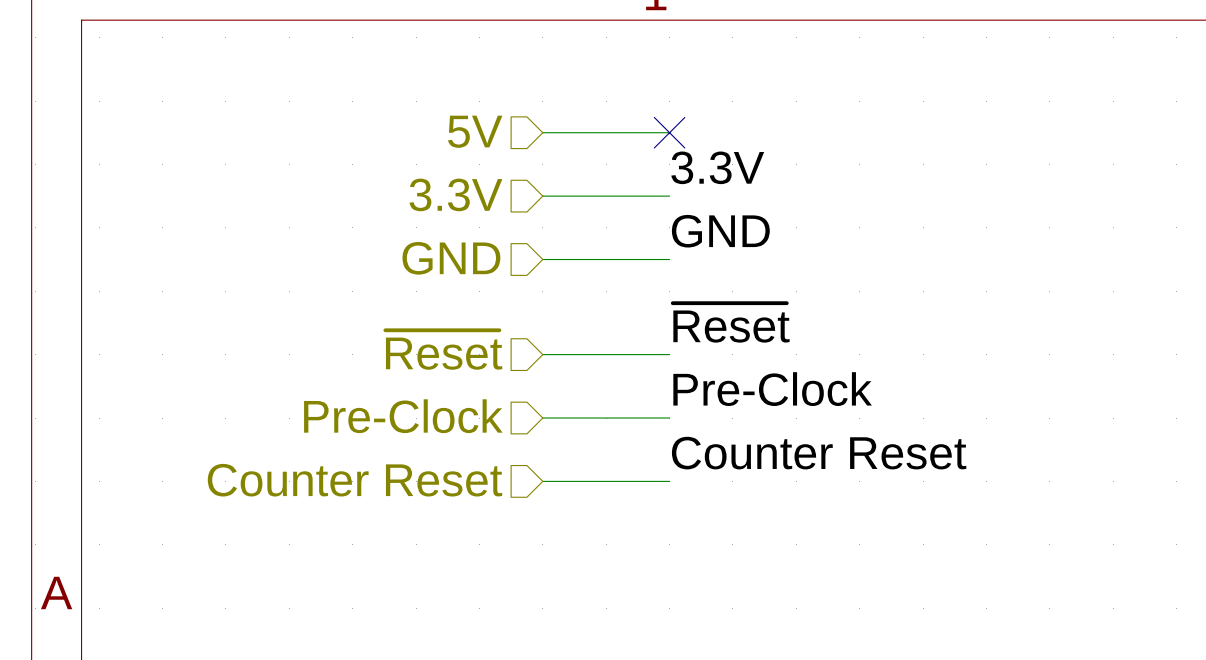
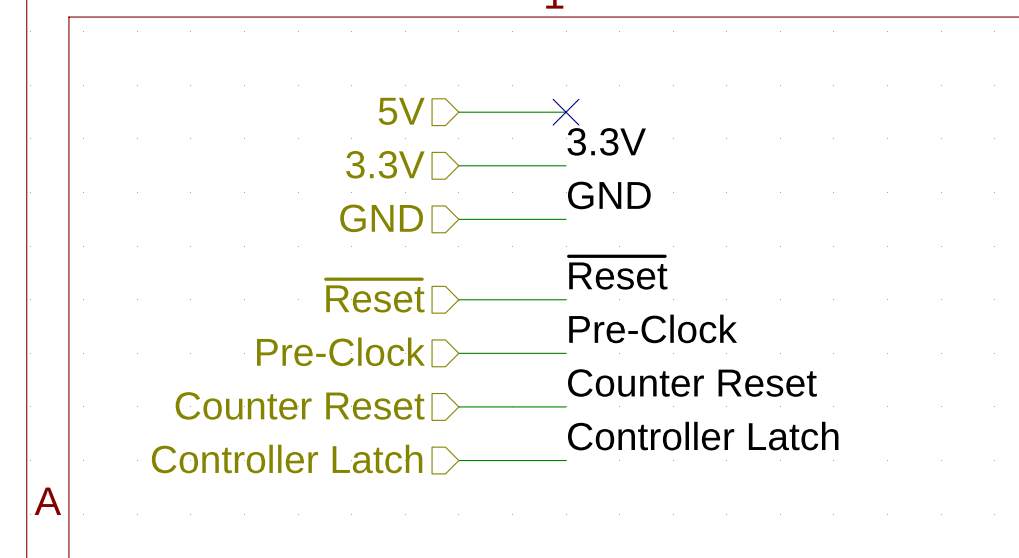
label: none -> Controller Latch (703, 436)
hierarchical label: none -> Controller Latch (287, 459)
wire: none -> (458, 460) (566, 460)

